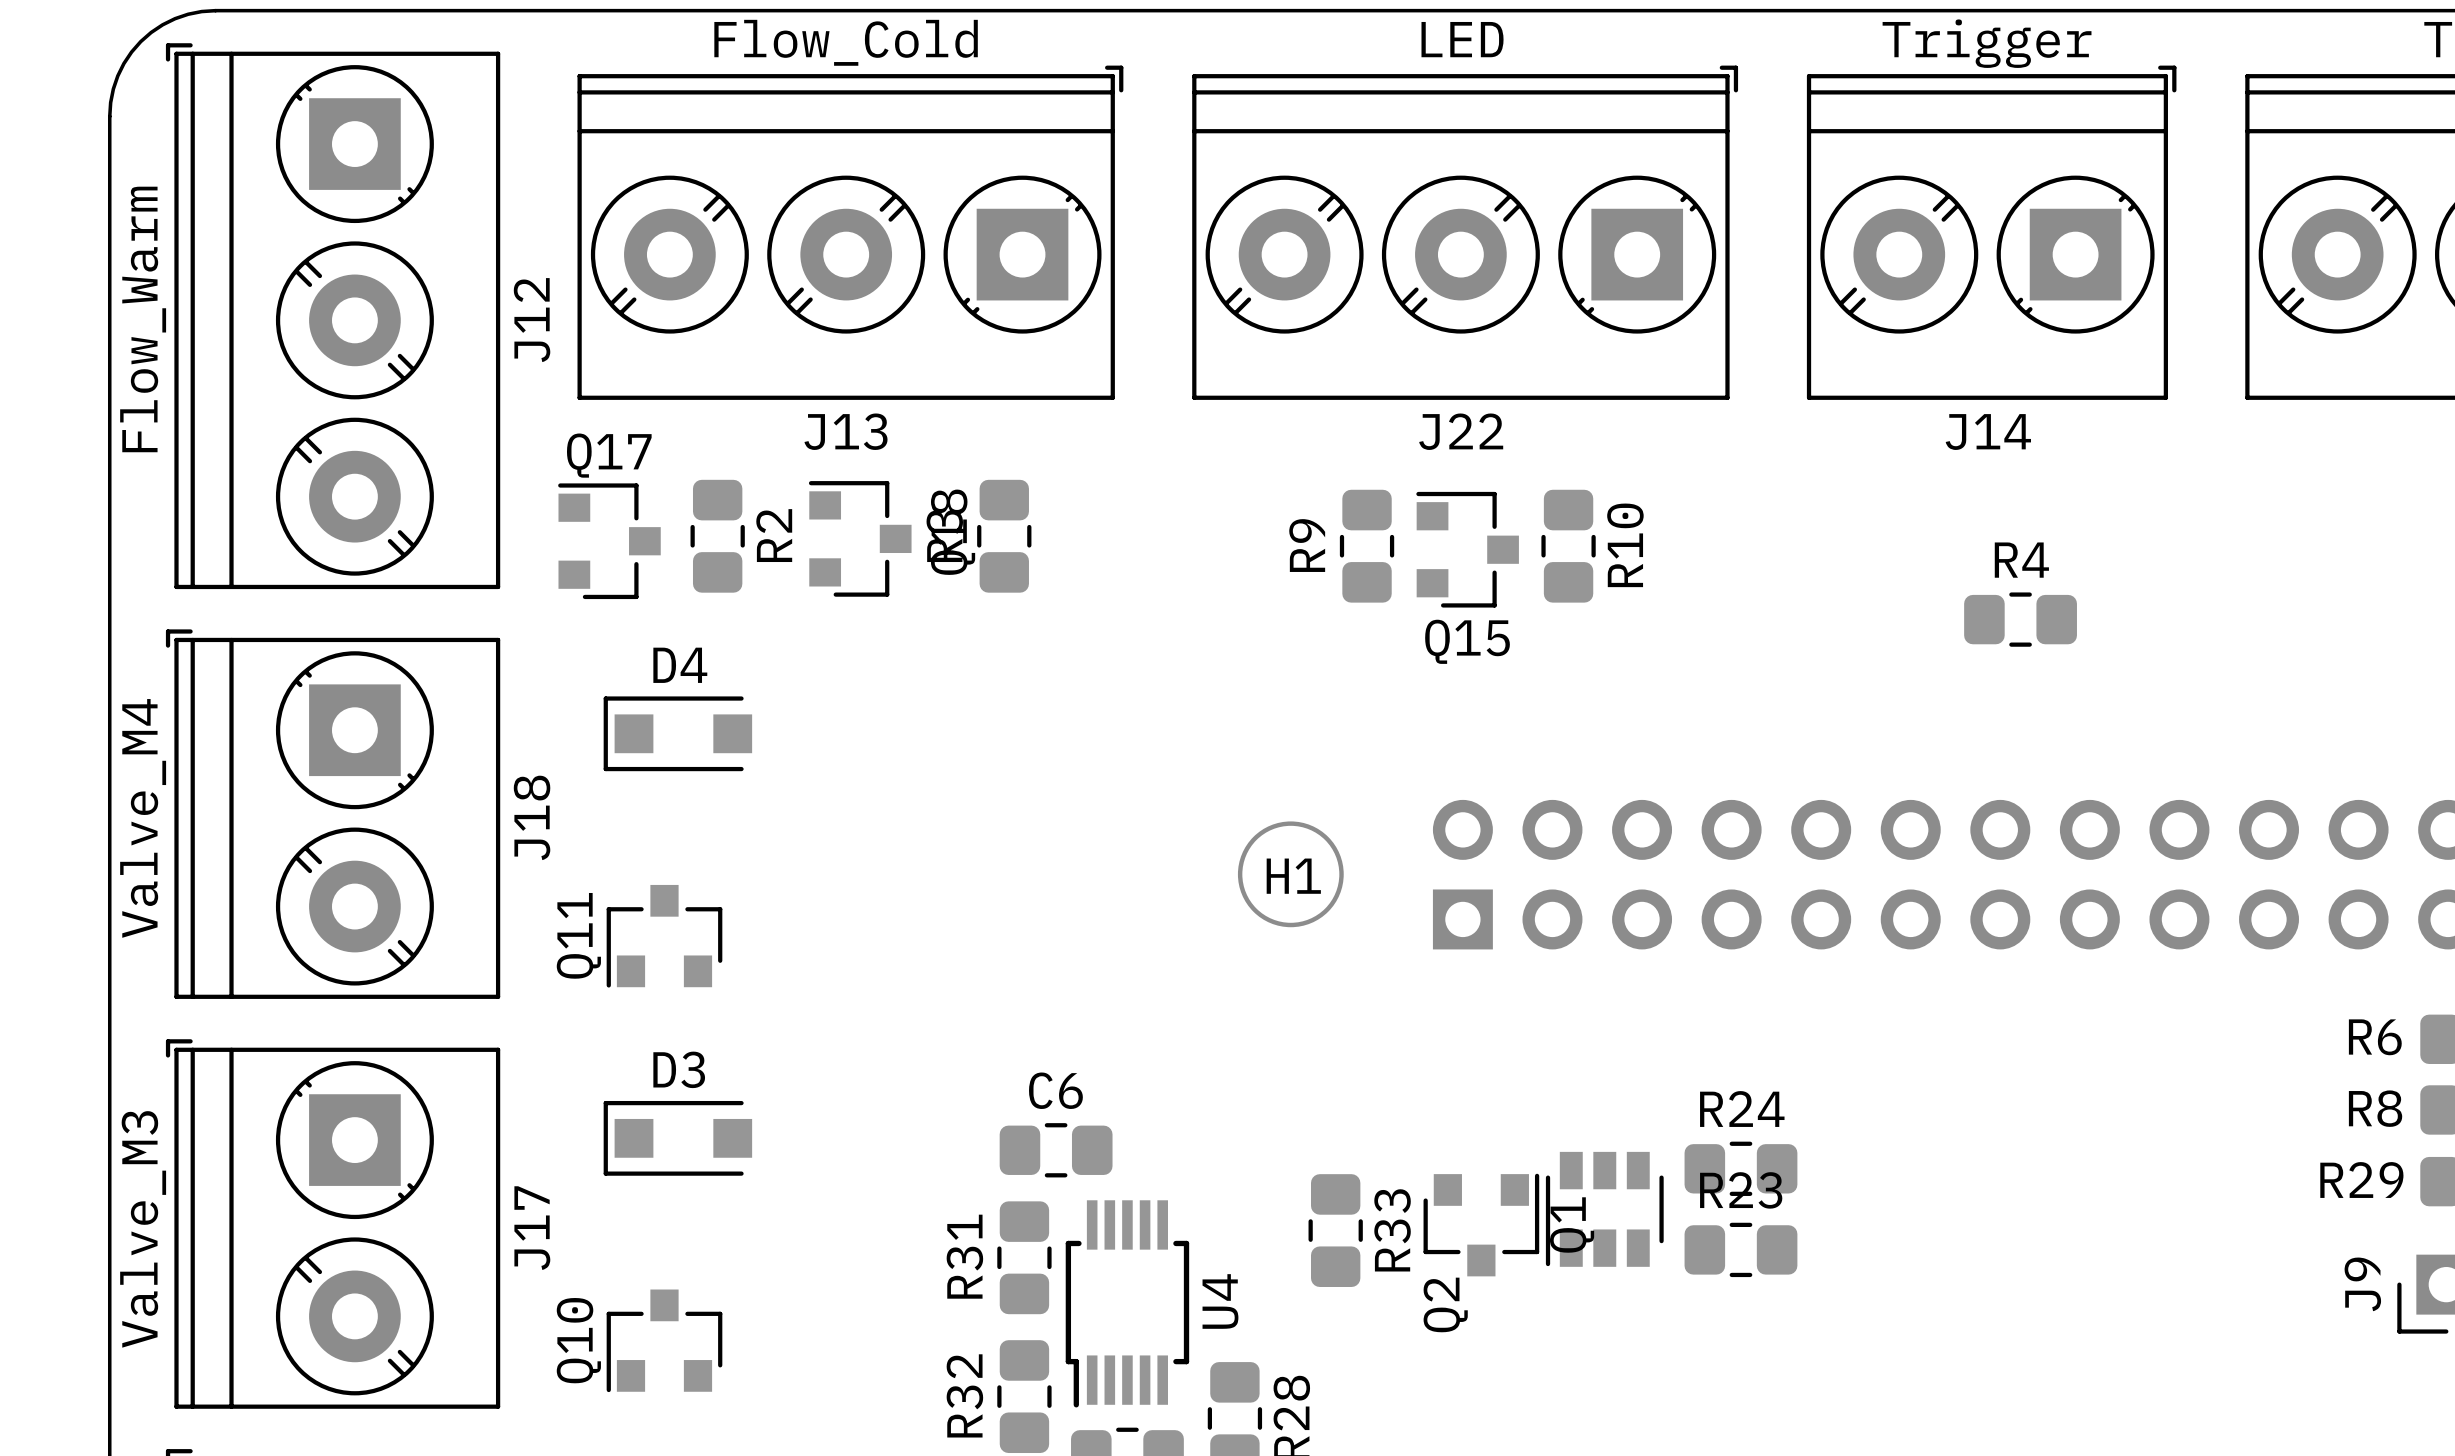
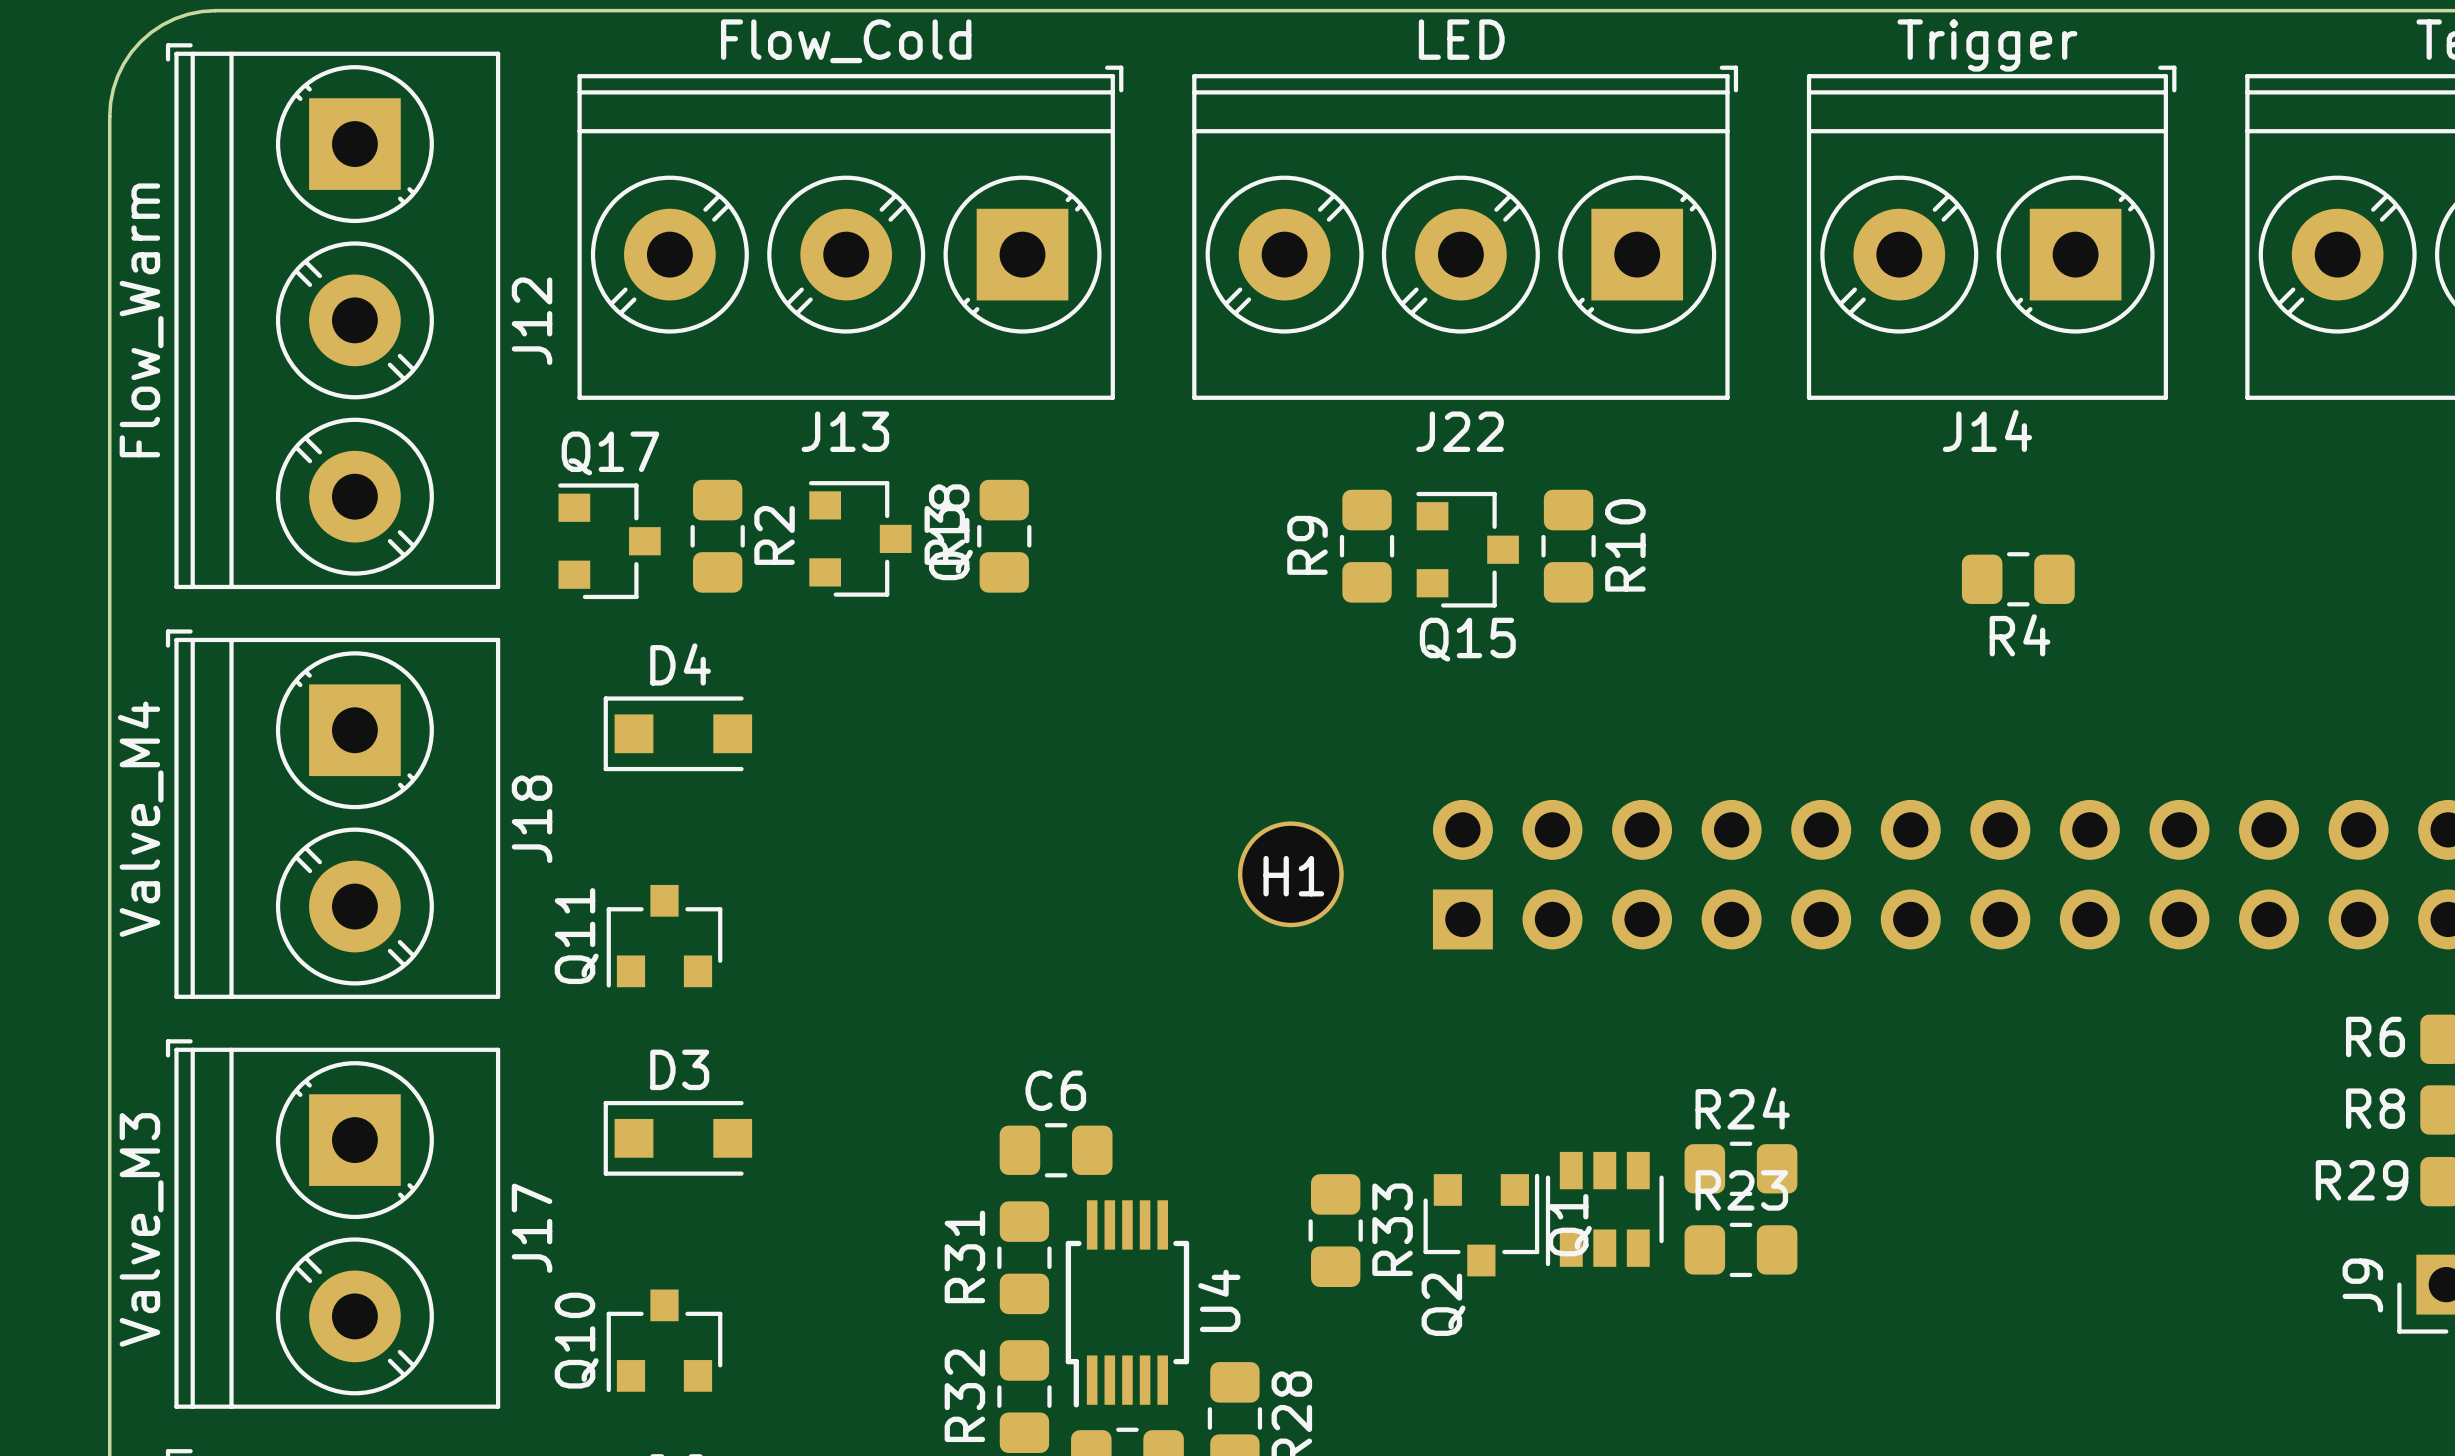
R4 name position: R4 (2021, 560) -> R4 (2019, 635)
R4 position: (2020, 619) -> (2018, 579)

